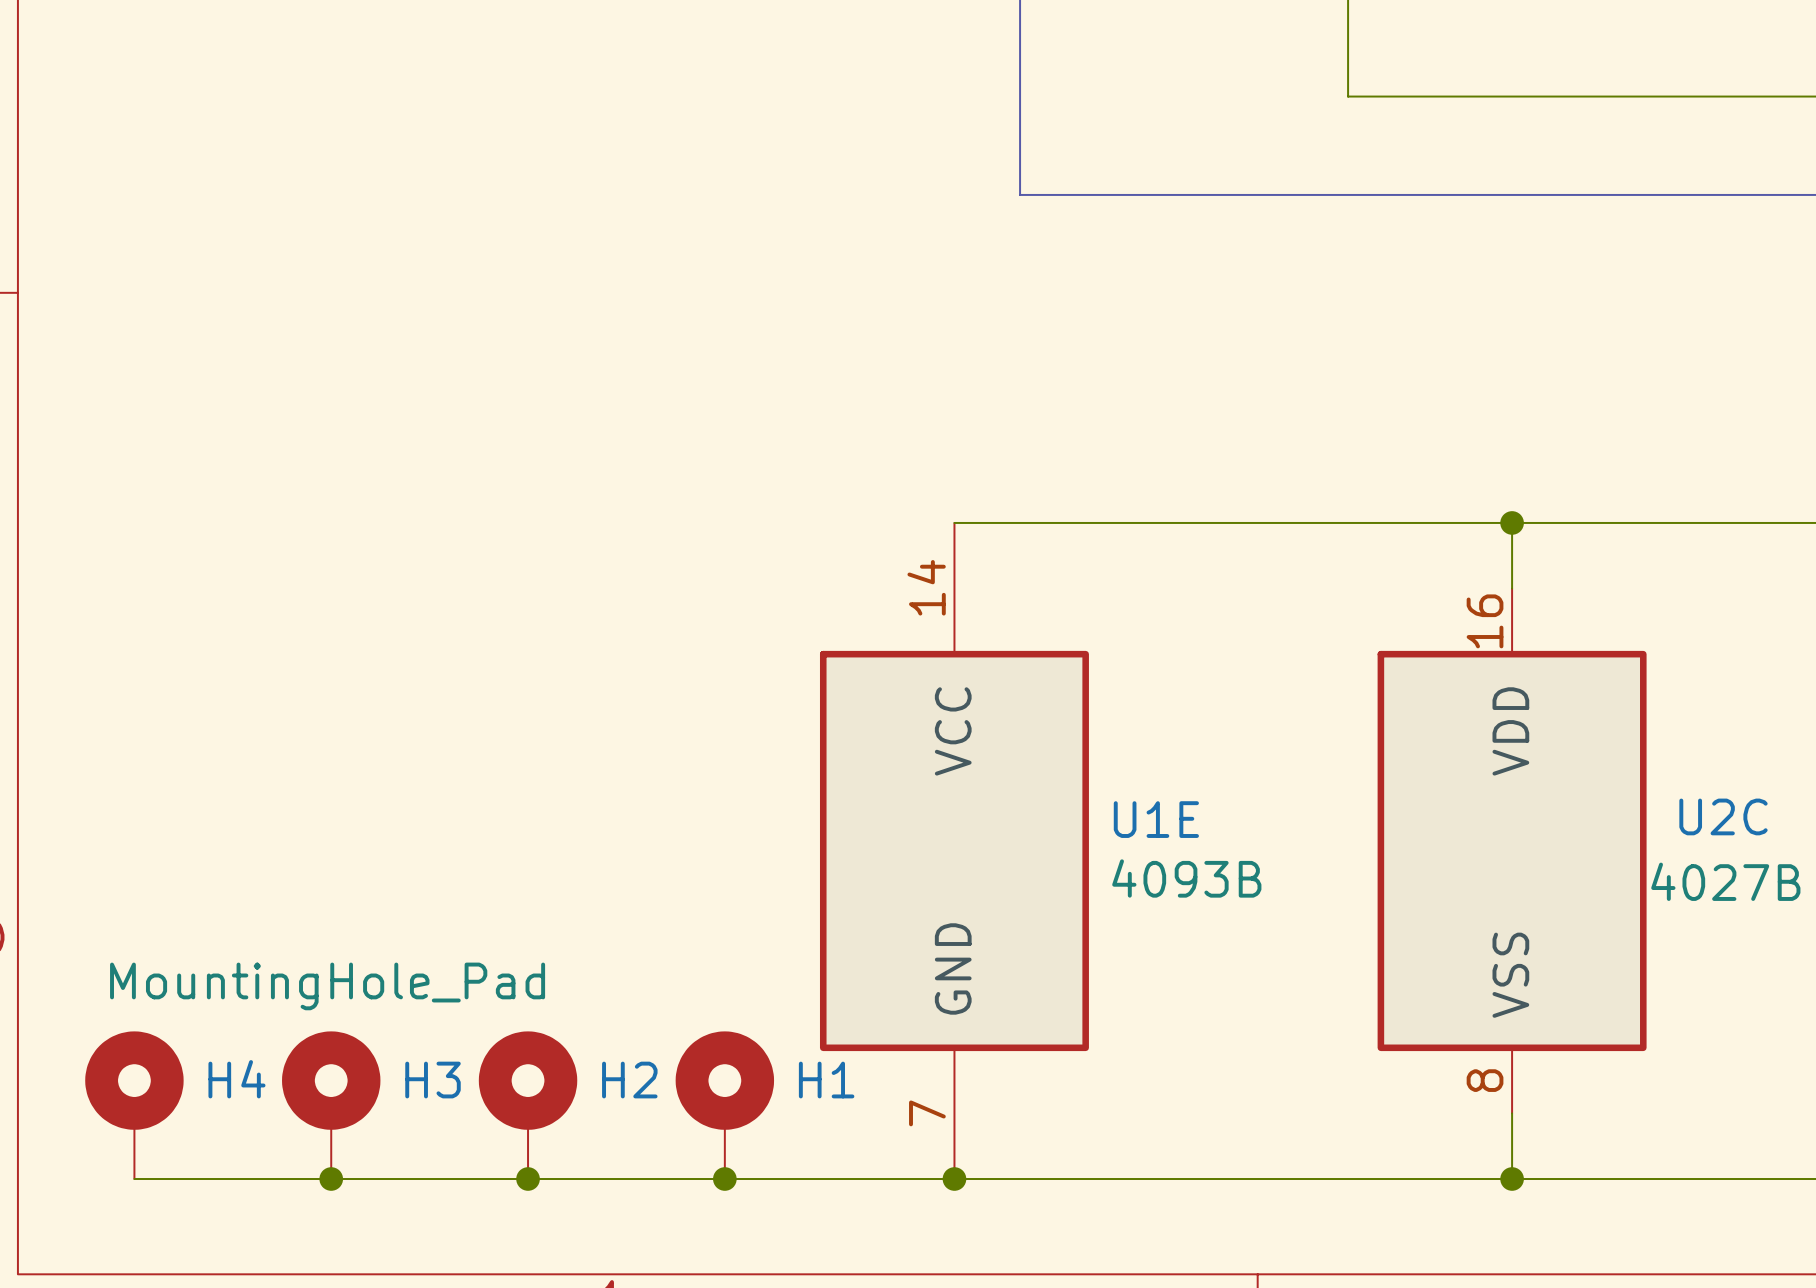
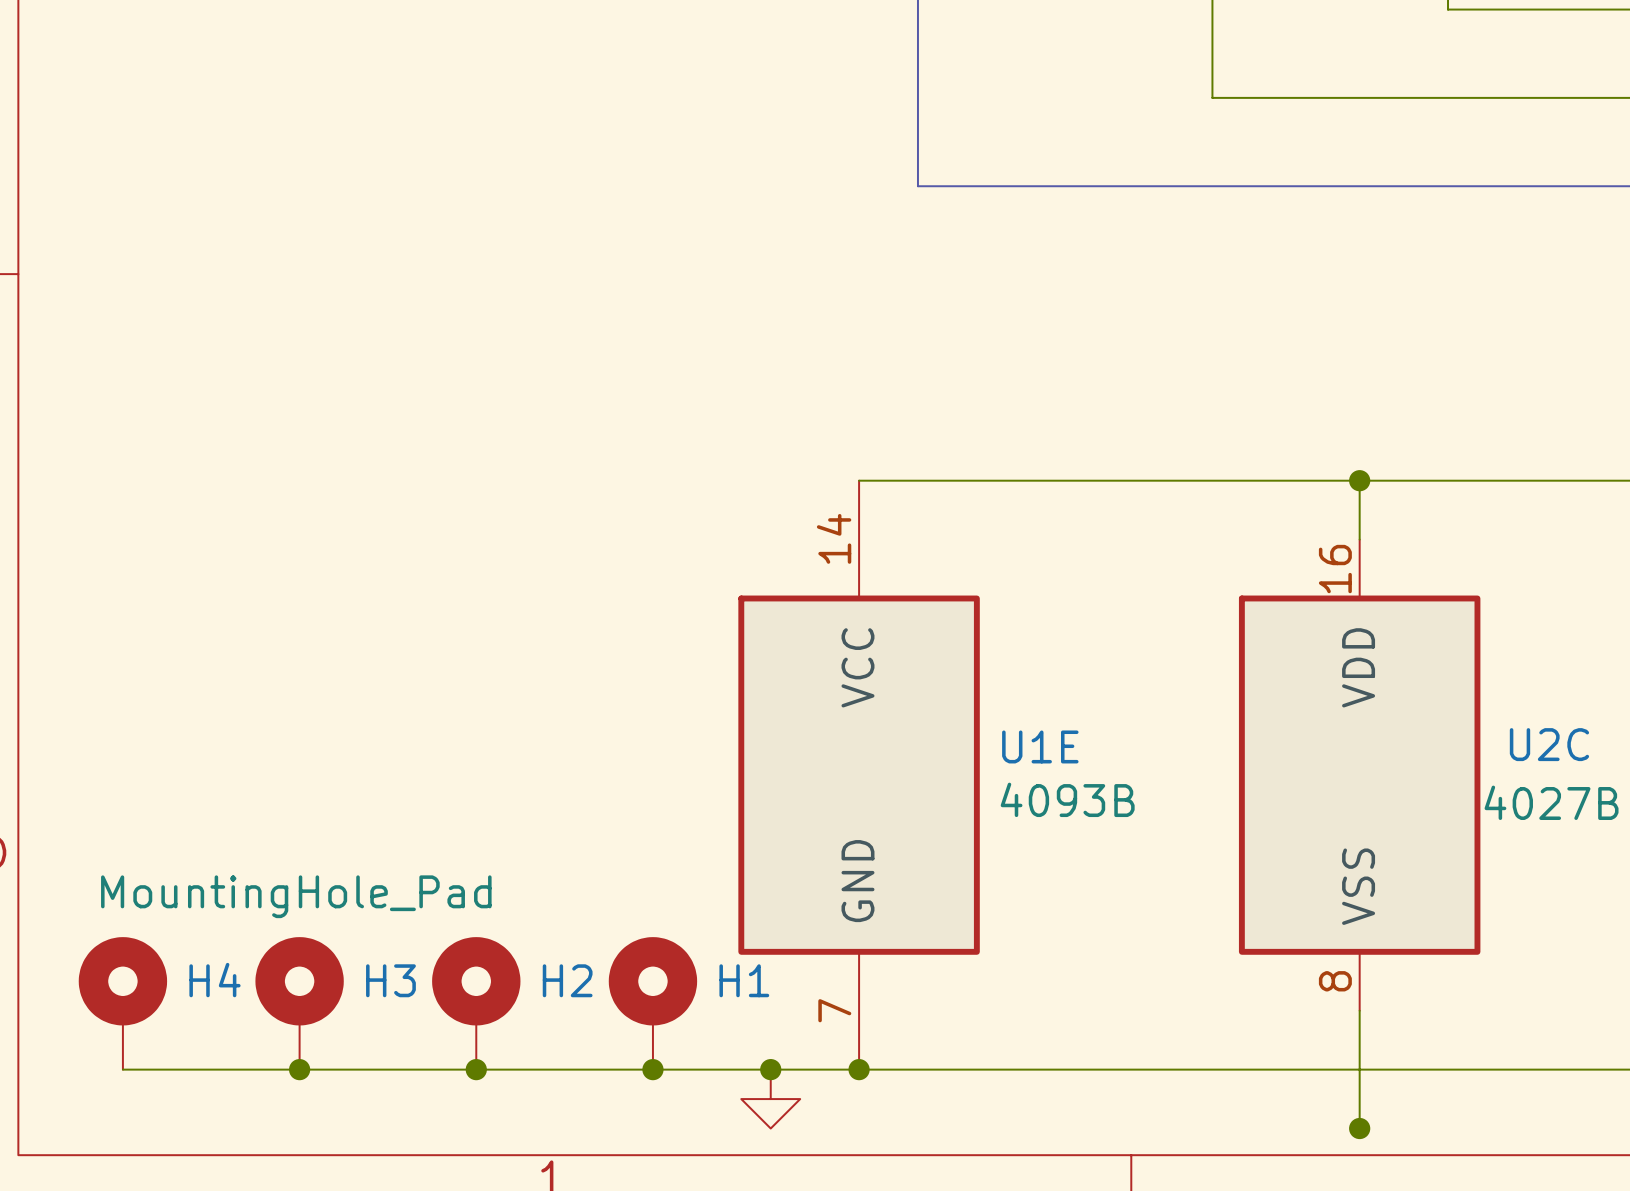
junction: none -> (770, 1069)
wire: none -> (1359, 1069) (1359, 1128)
junction position: (1512, 1179) -> (1359, 1128)
power symbol: none -> (770, 1099)

